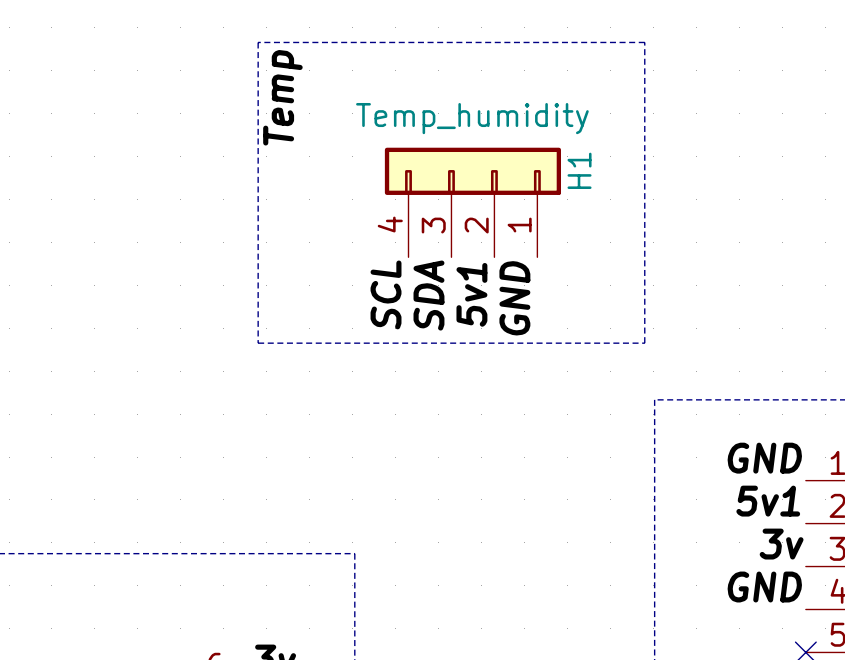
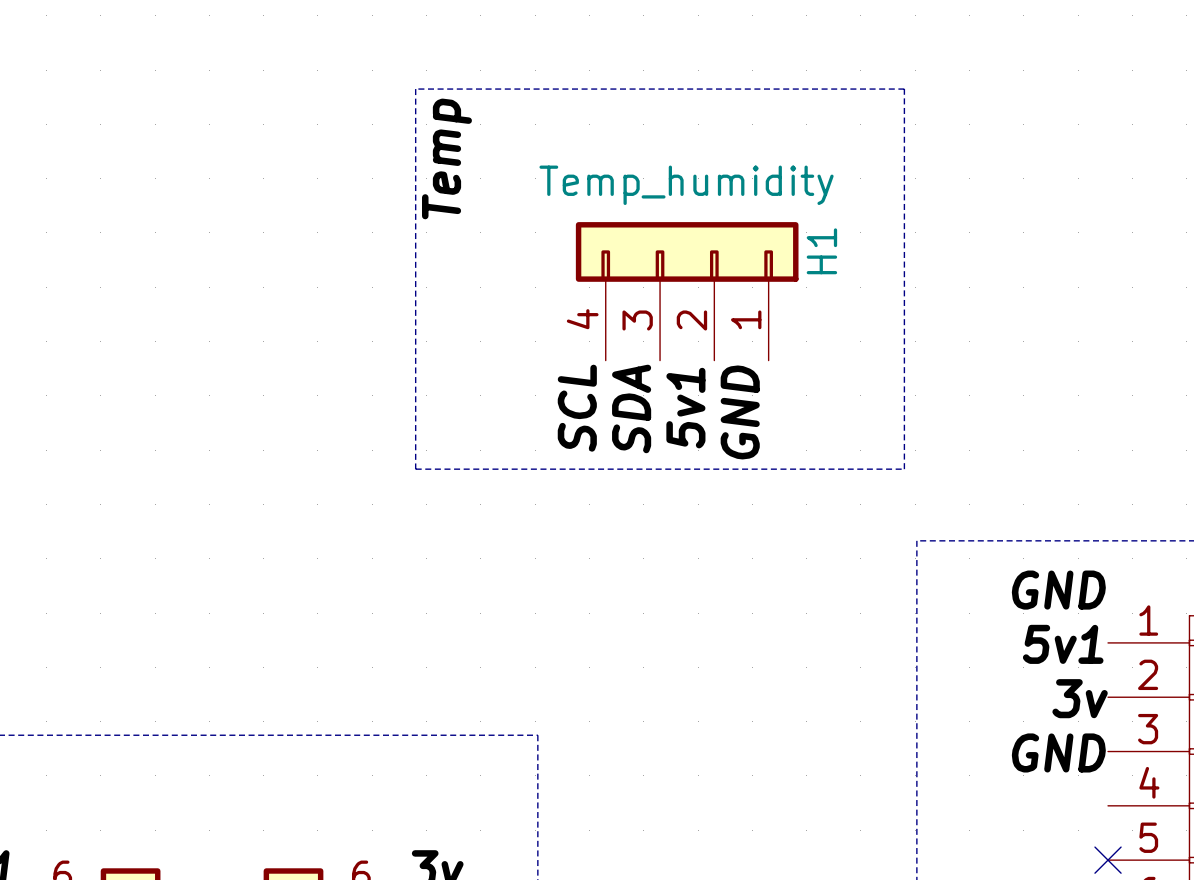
label position: GND (764, 458) -> GND (1058, 590)
label position: 5v1 (768, 501) -> 5v1 (1063, 644)
label position: 3v (781, 544) -> 3v (1080, 698)
label position: GND (764, 587) -> GND (1058, 752)

